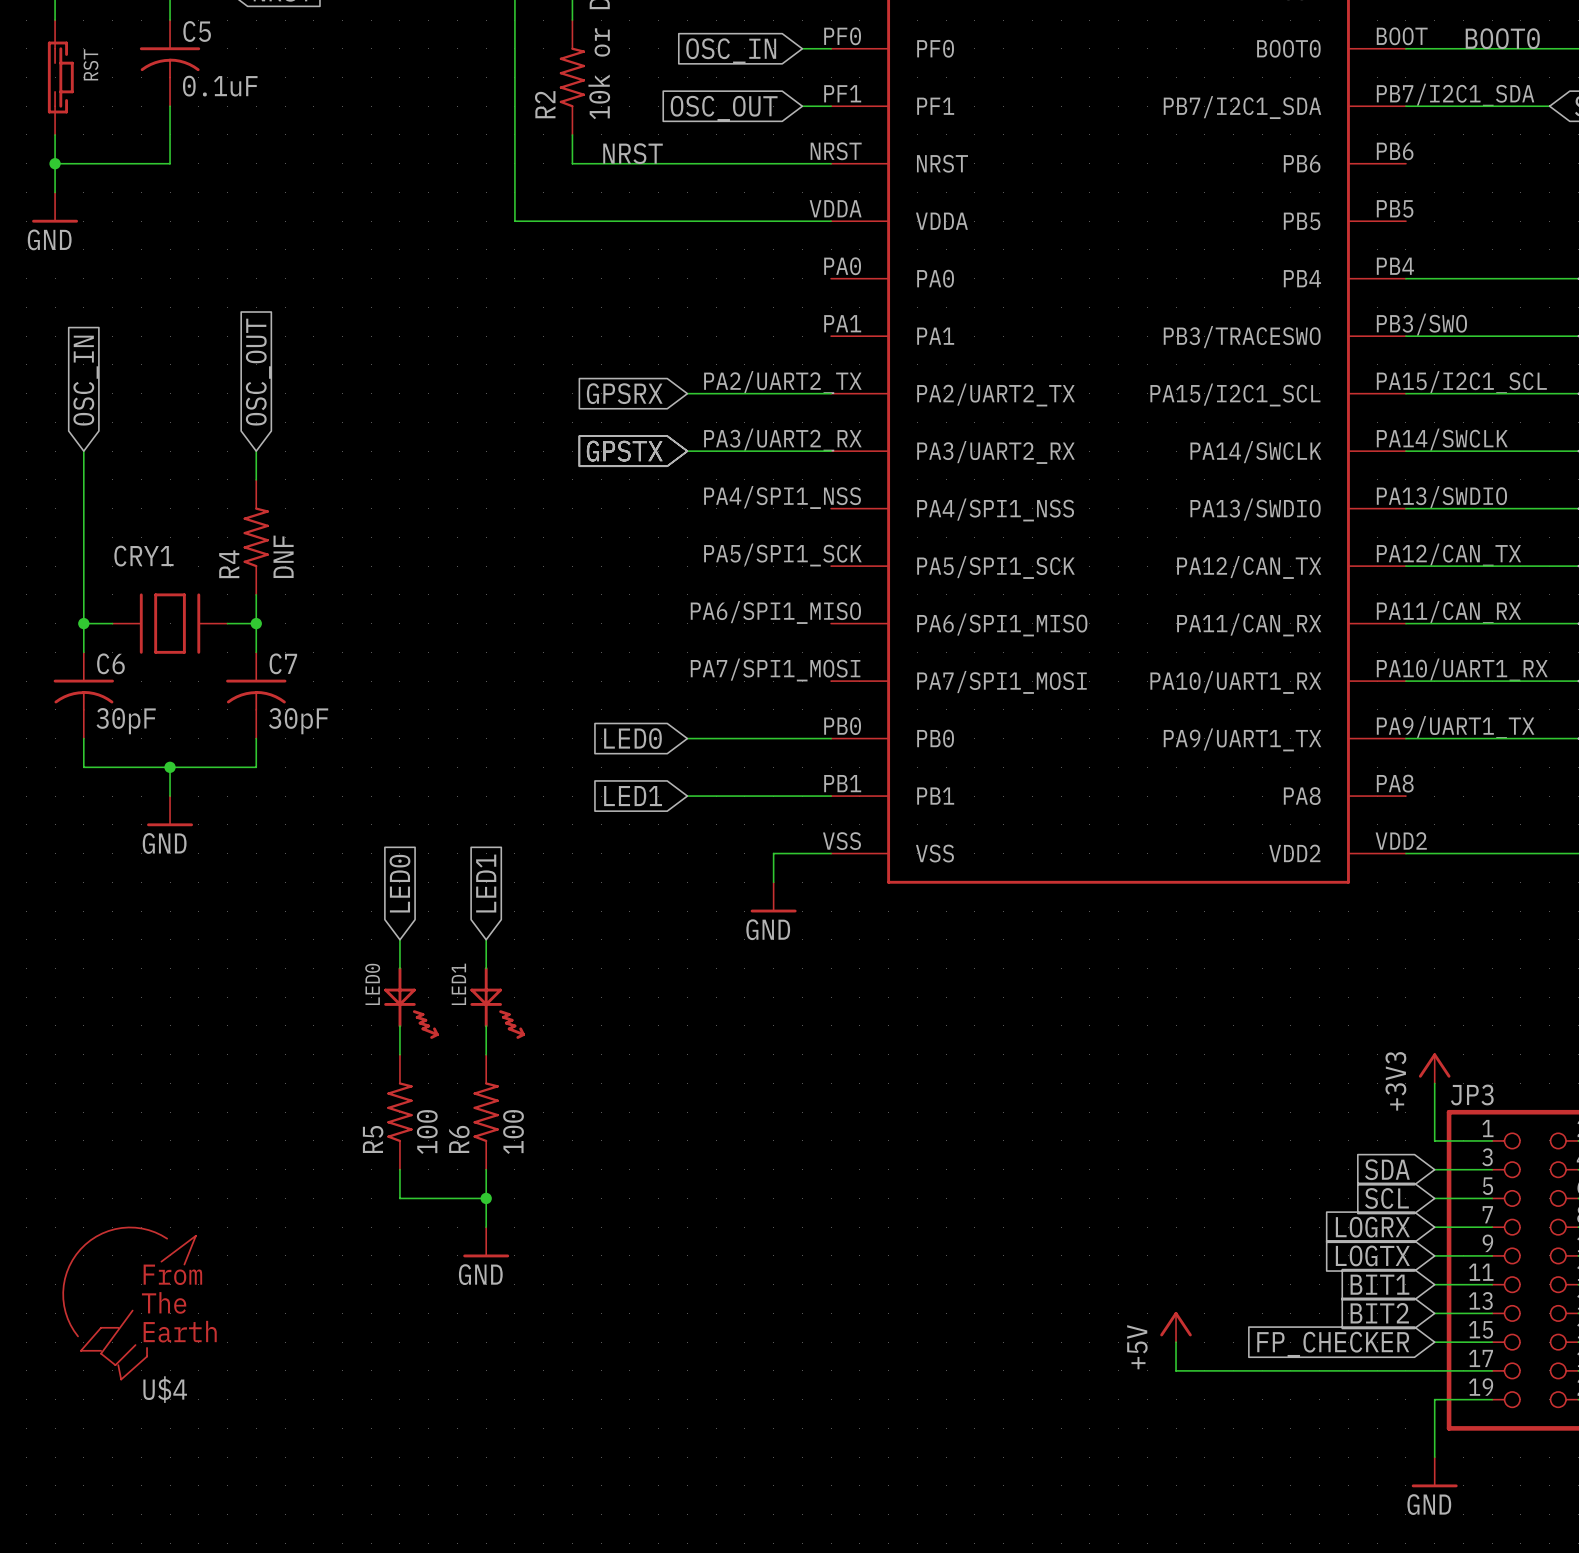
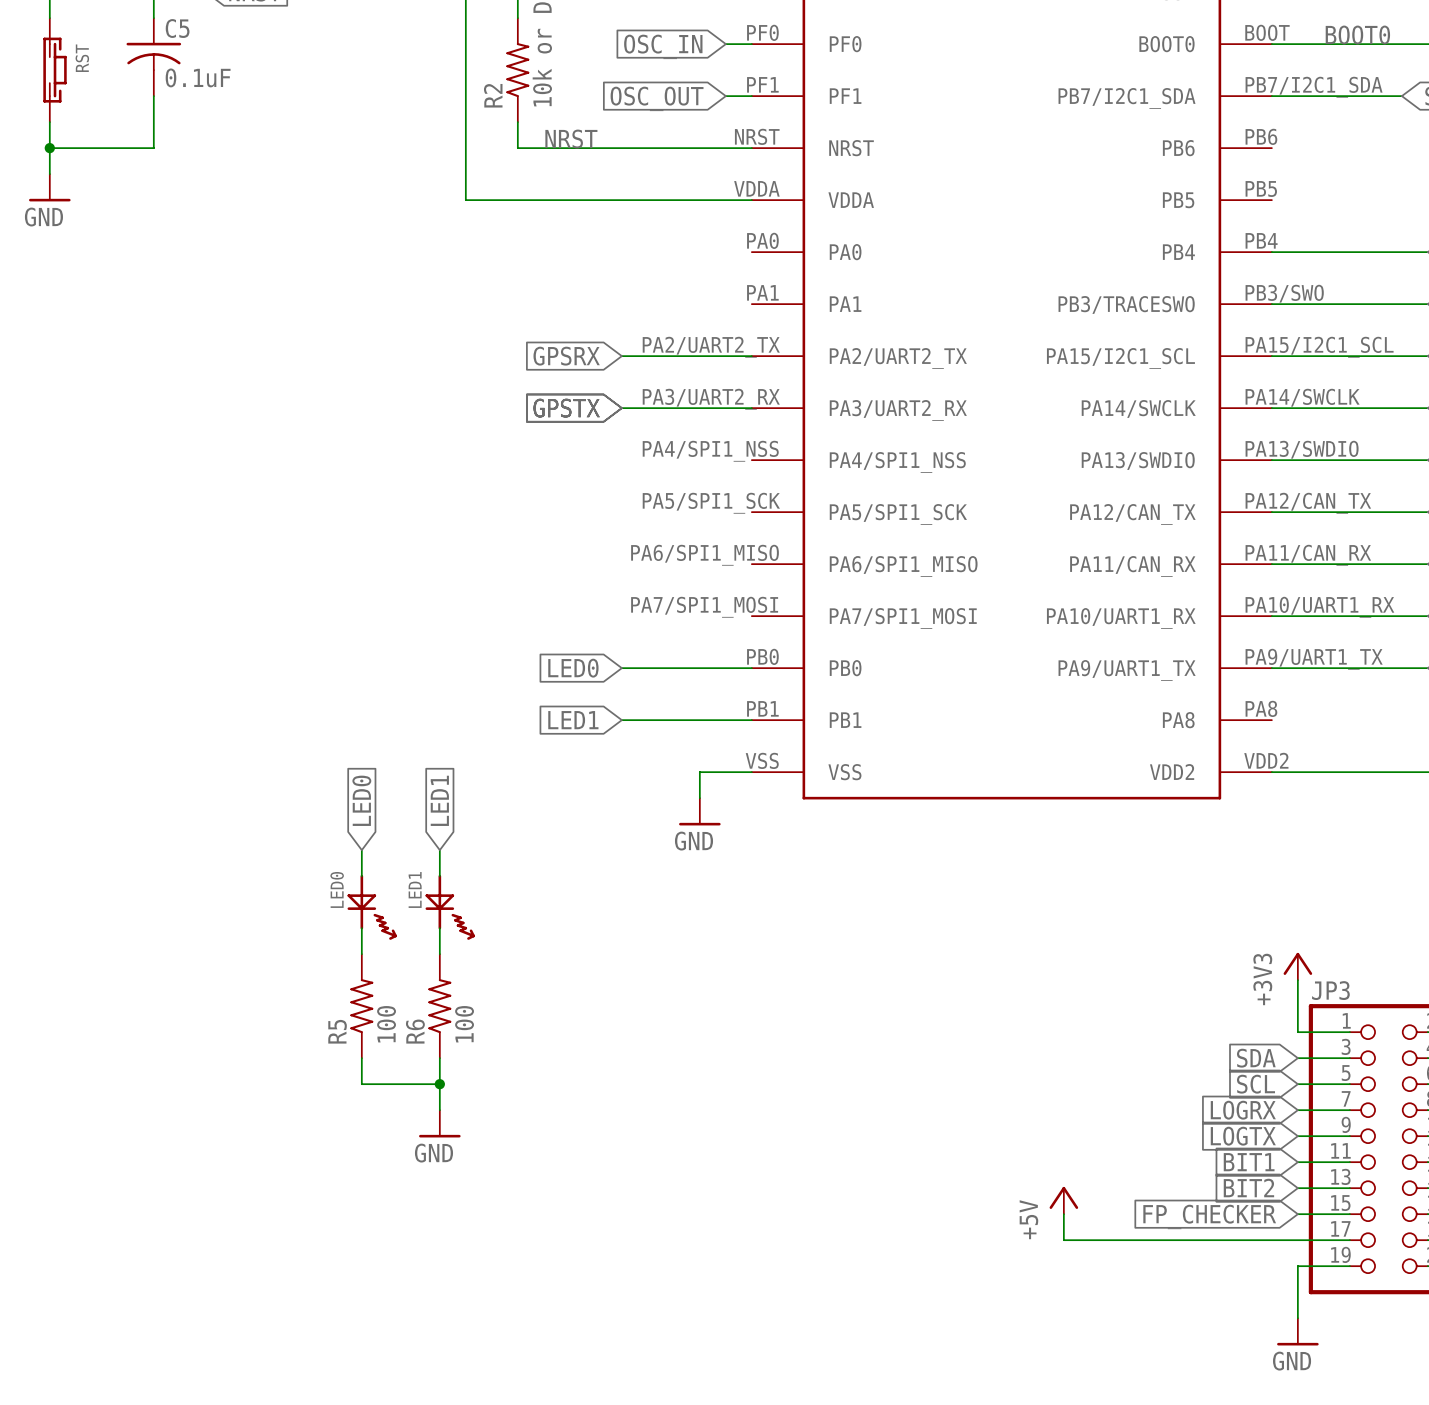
global label: OSC_OUT (258, 372) -> none
global label: OSC_IN (86, 380) -> none
wire: (83, 451) (83, 652) -> none
wire: (256, 451) (256, 479) -> none
R4: DNF (256, 537) -> none
wire: (256, 594) (256, 652) -> none
wire: (83, 623) (112, 623) -> none
junction: (83, 623) -> none
CRY1: (170, 623) -> none
wire: (227, 623) (256, 623) -> none
junction: (256, 623) -> none
C6: 30pF (83, 695) -> none
C7: 30pF (256, 695) -> none
wire: (83, 738) (83, 767) (256, 767) (256, 738) -> none
wire: (170, 767) (170, 796) -> none
junction: (170, 767) -> none
power symbol: GND (170, 811) -> none
U$4: (129, 1303) -> none

